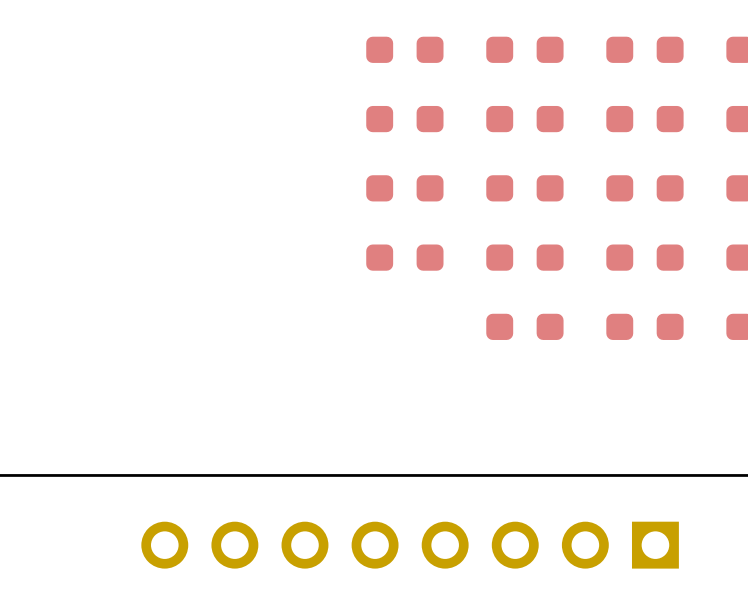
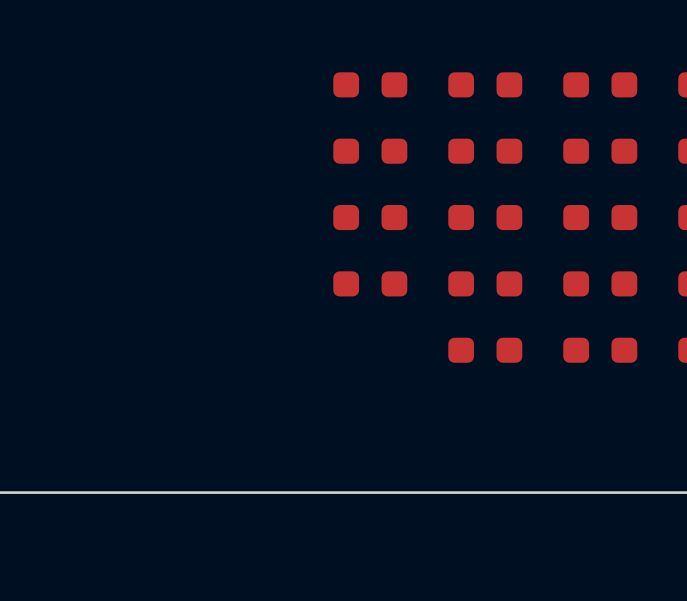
part: (410, 545) -> none

